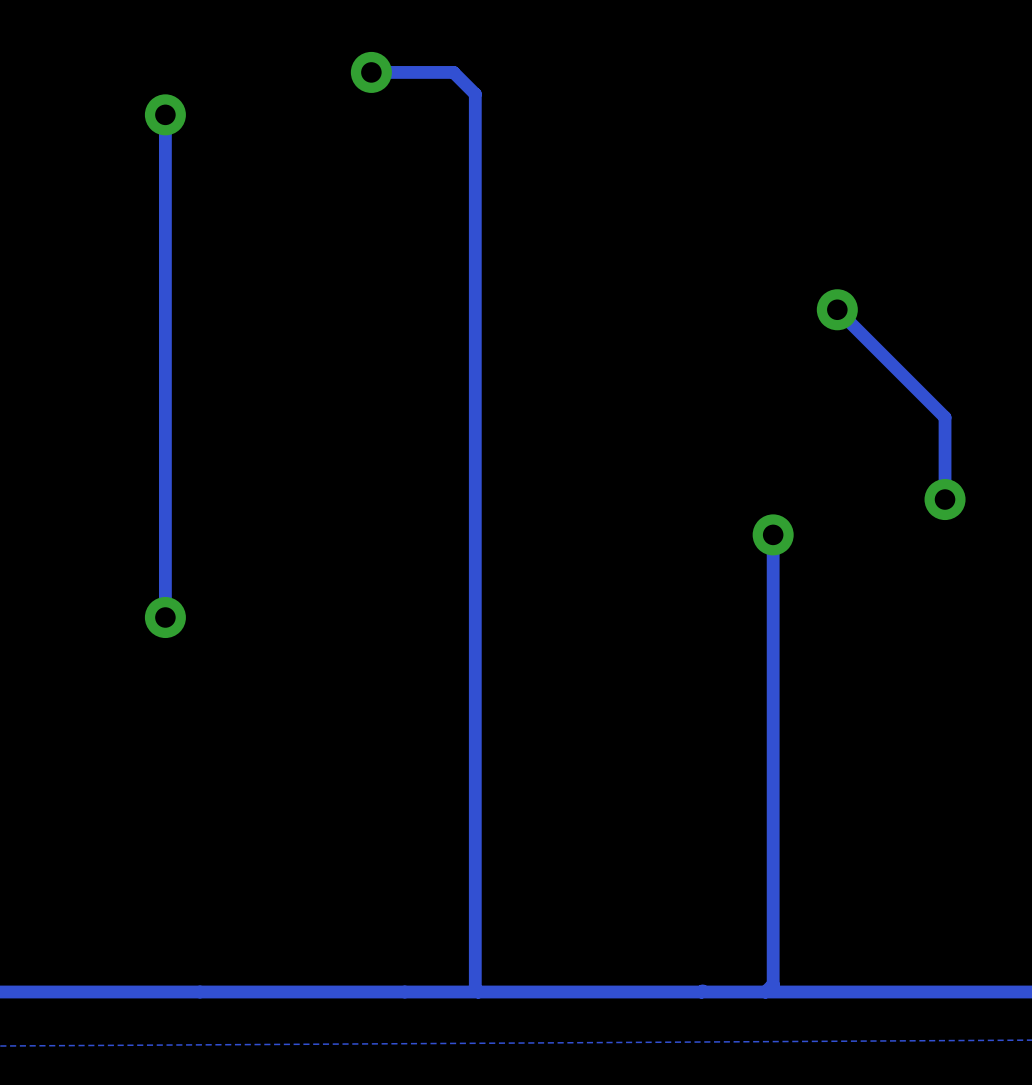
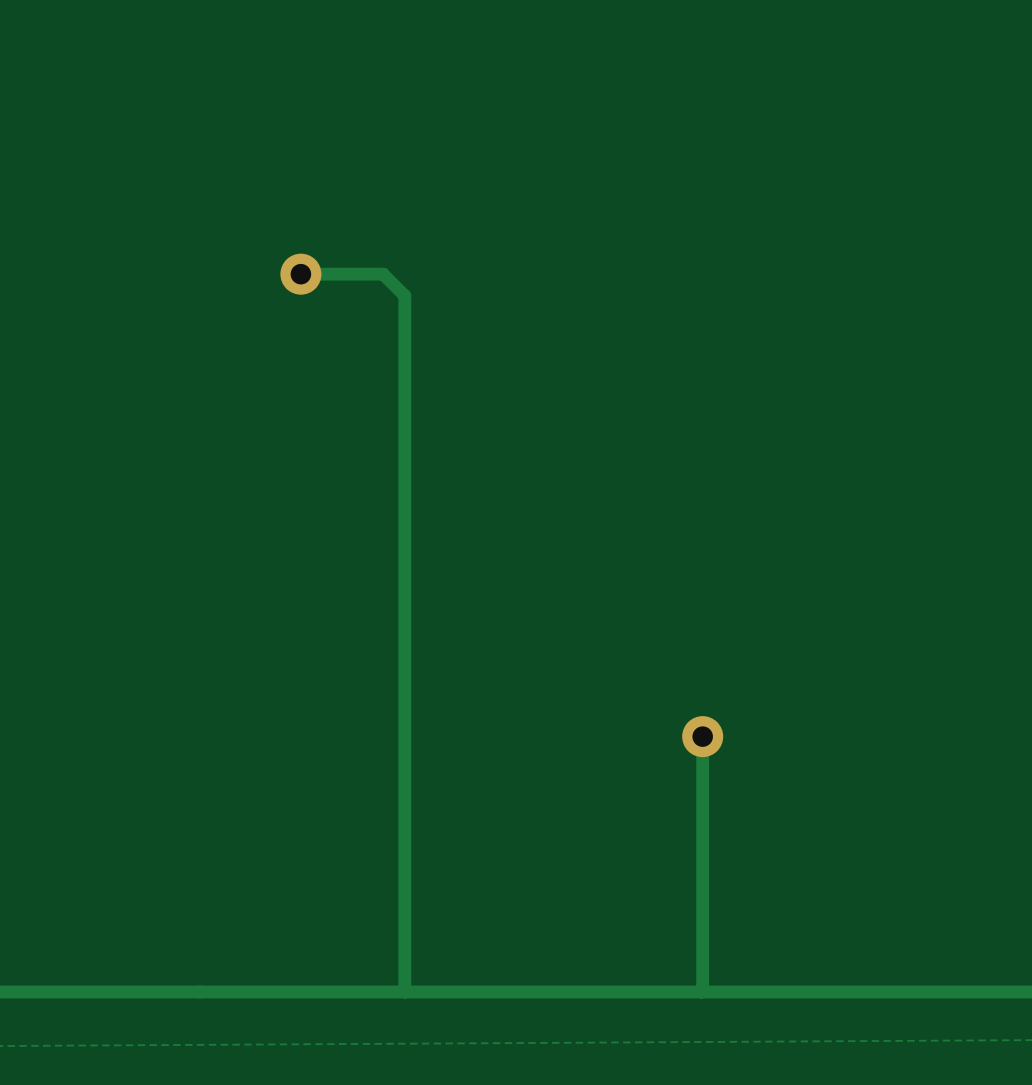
track: (371, 72) (453, 72) (475, 94) (475, 989) (478, 992) -> none
via: (371, 72) -> none
track: (165, 114) (165, 617) -> none
via: (165, 114) -> none
track: none -> (300, 274) (383, 274) (404, 295) (404, 992)
via: none -> (300, 274)
track: (837, 309) (945, 417) (945, 499) -> none
via: (837, 309) -> none
via: (945, 499) -> none
track: (773, 534) (773, 984) (765, 992) -> none
via: (773, 534) -> none
via: (165, 617) -> none
track: none -> (702, 736) (702, 990)
via: none -> (702, 736)

